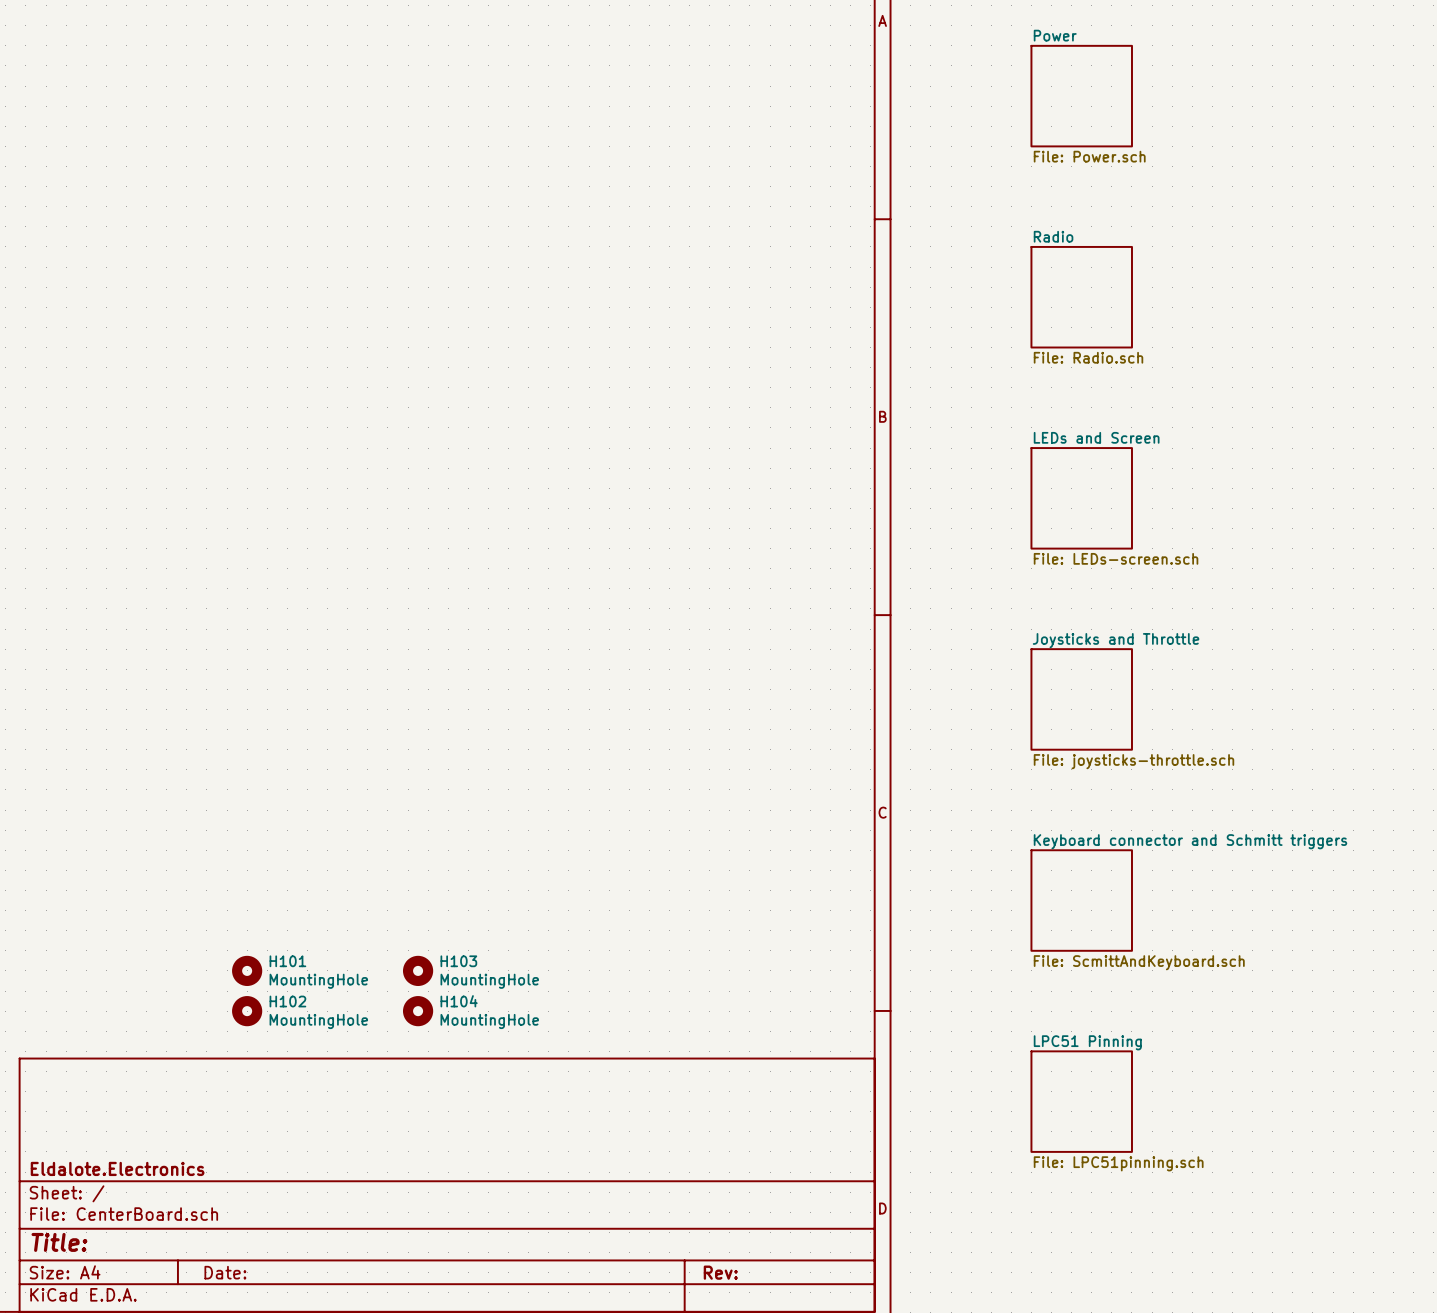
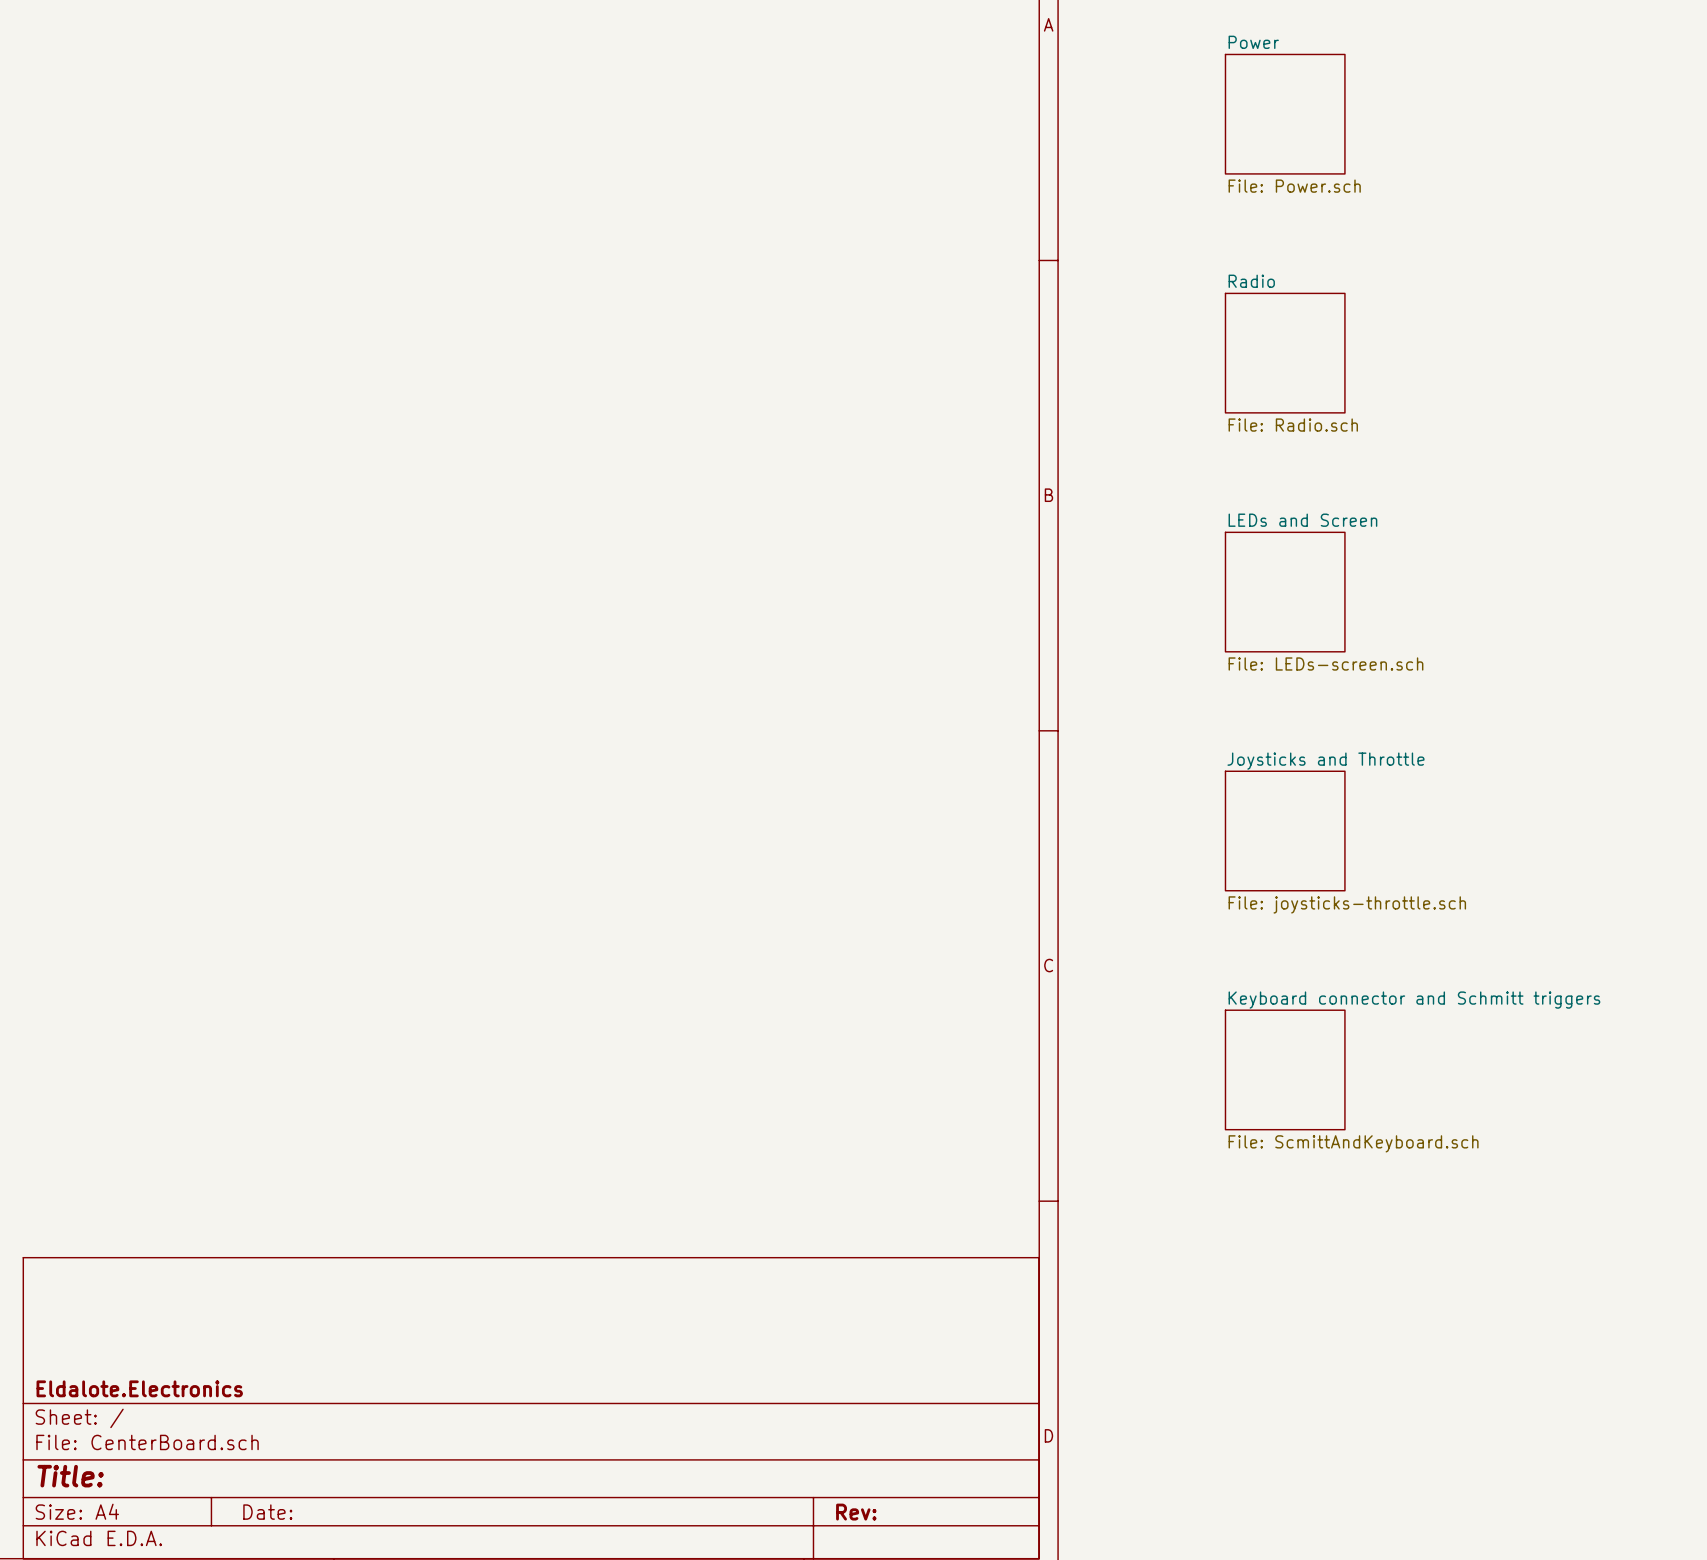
H101: MountingHole (247, 970) -> none
H103: MountingHole (418, 970) -> none
H102: MountingHole (247, 1011) -> none
H104: MountingHole (418, 1011) -> none
sheet LPC51 Pinning: File: LPC51pinning.sch (1081, 1101) -> none

